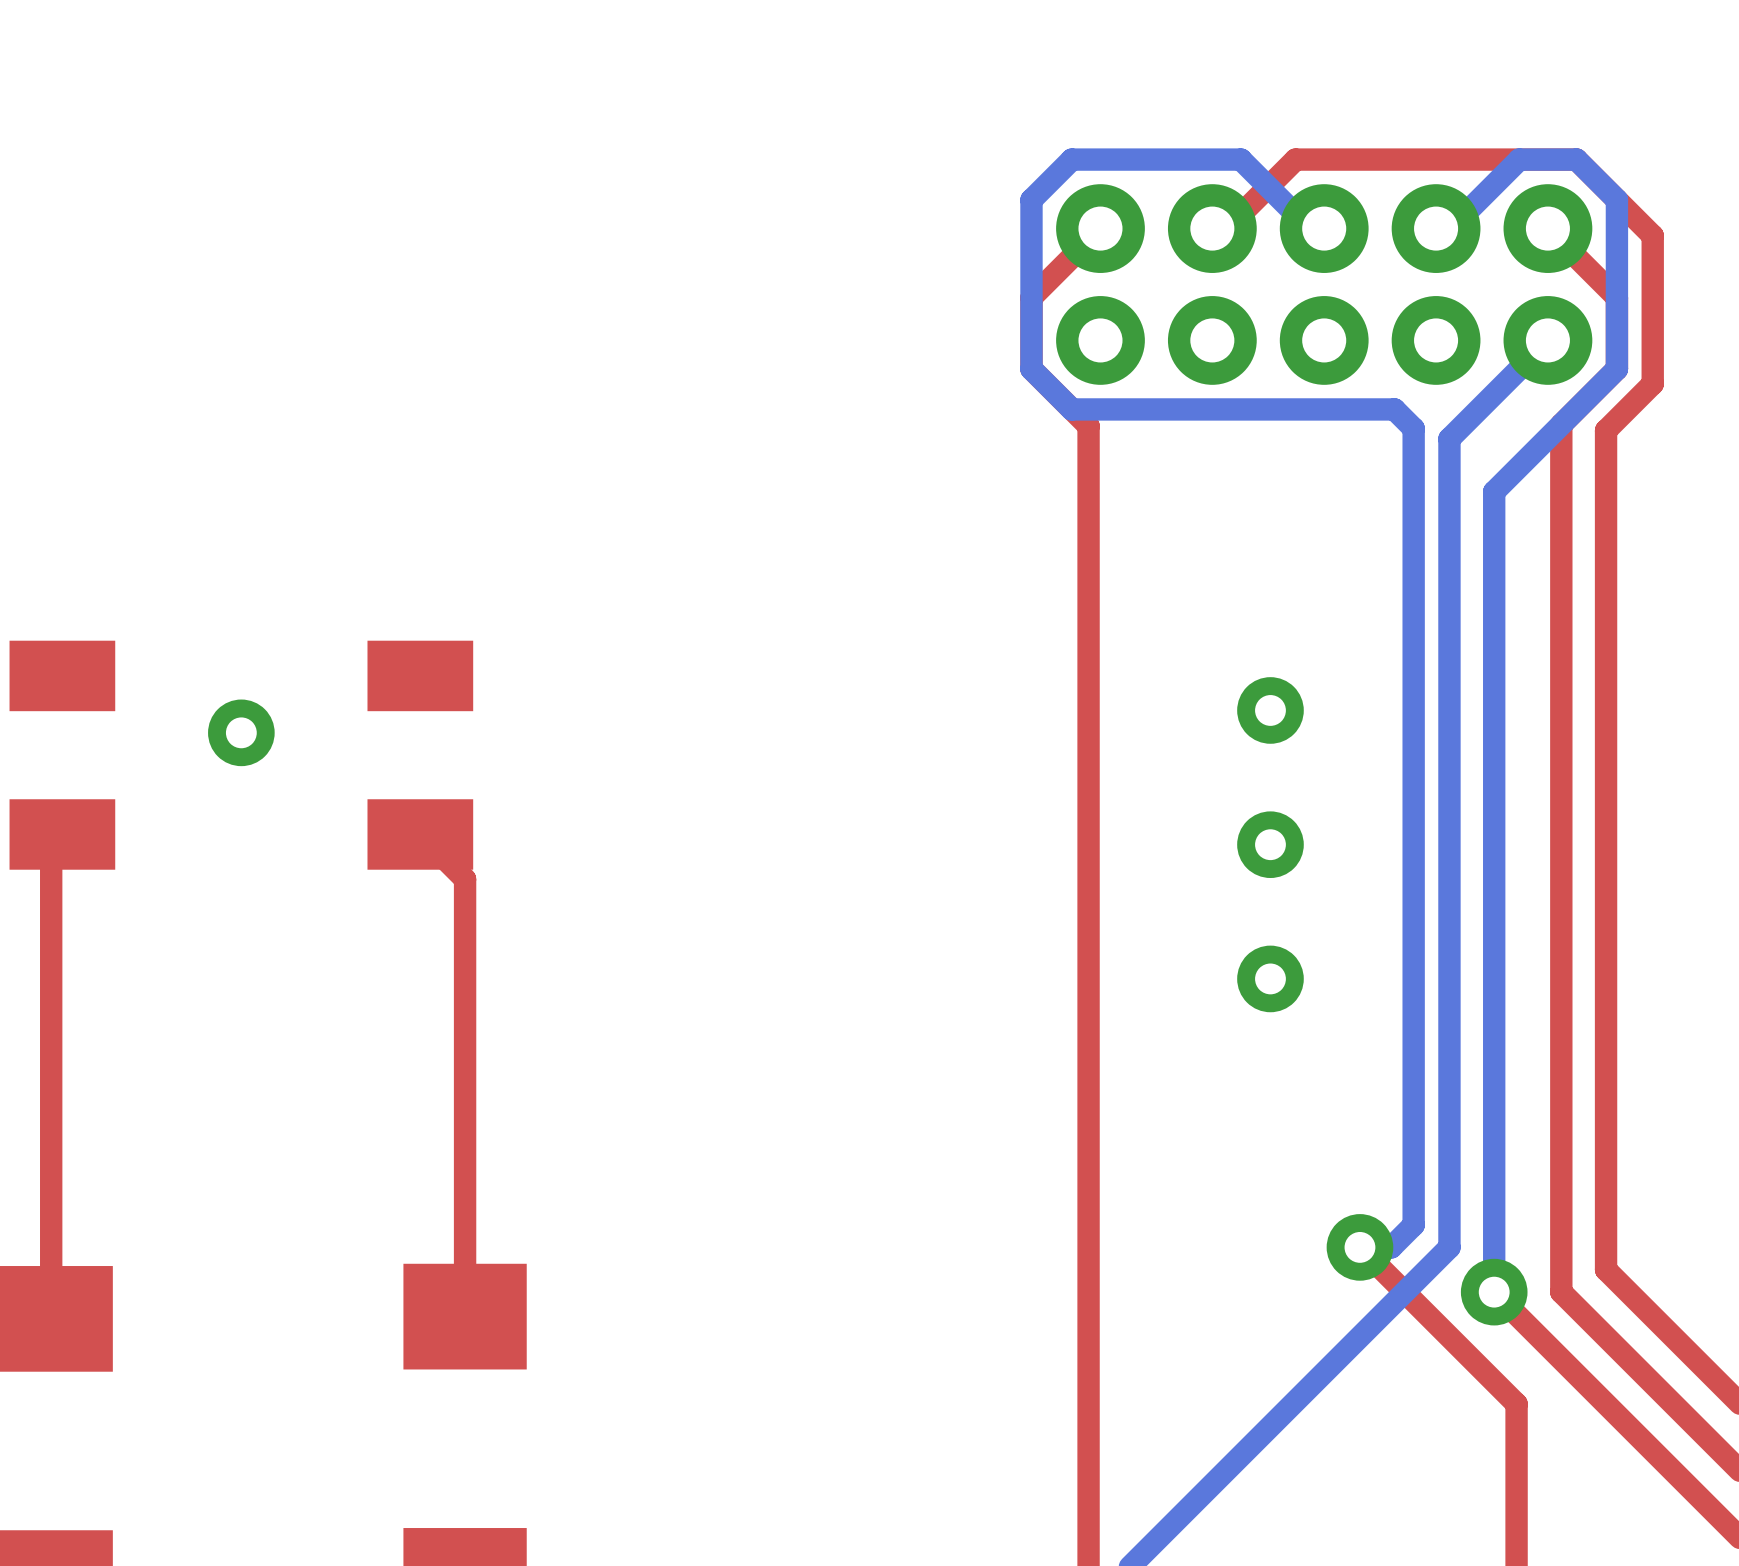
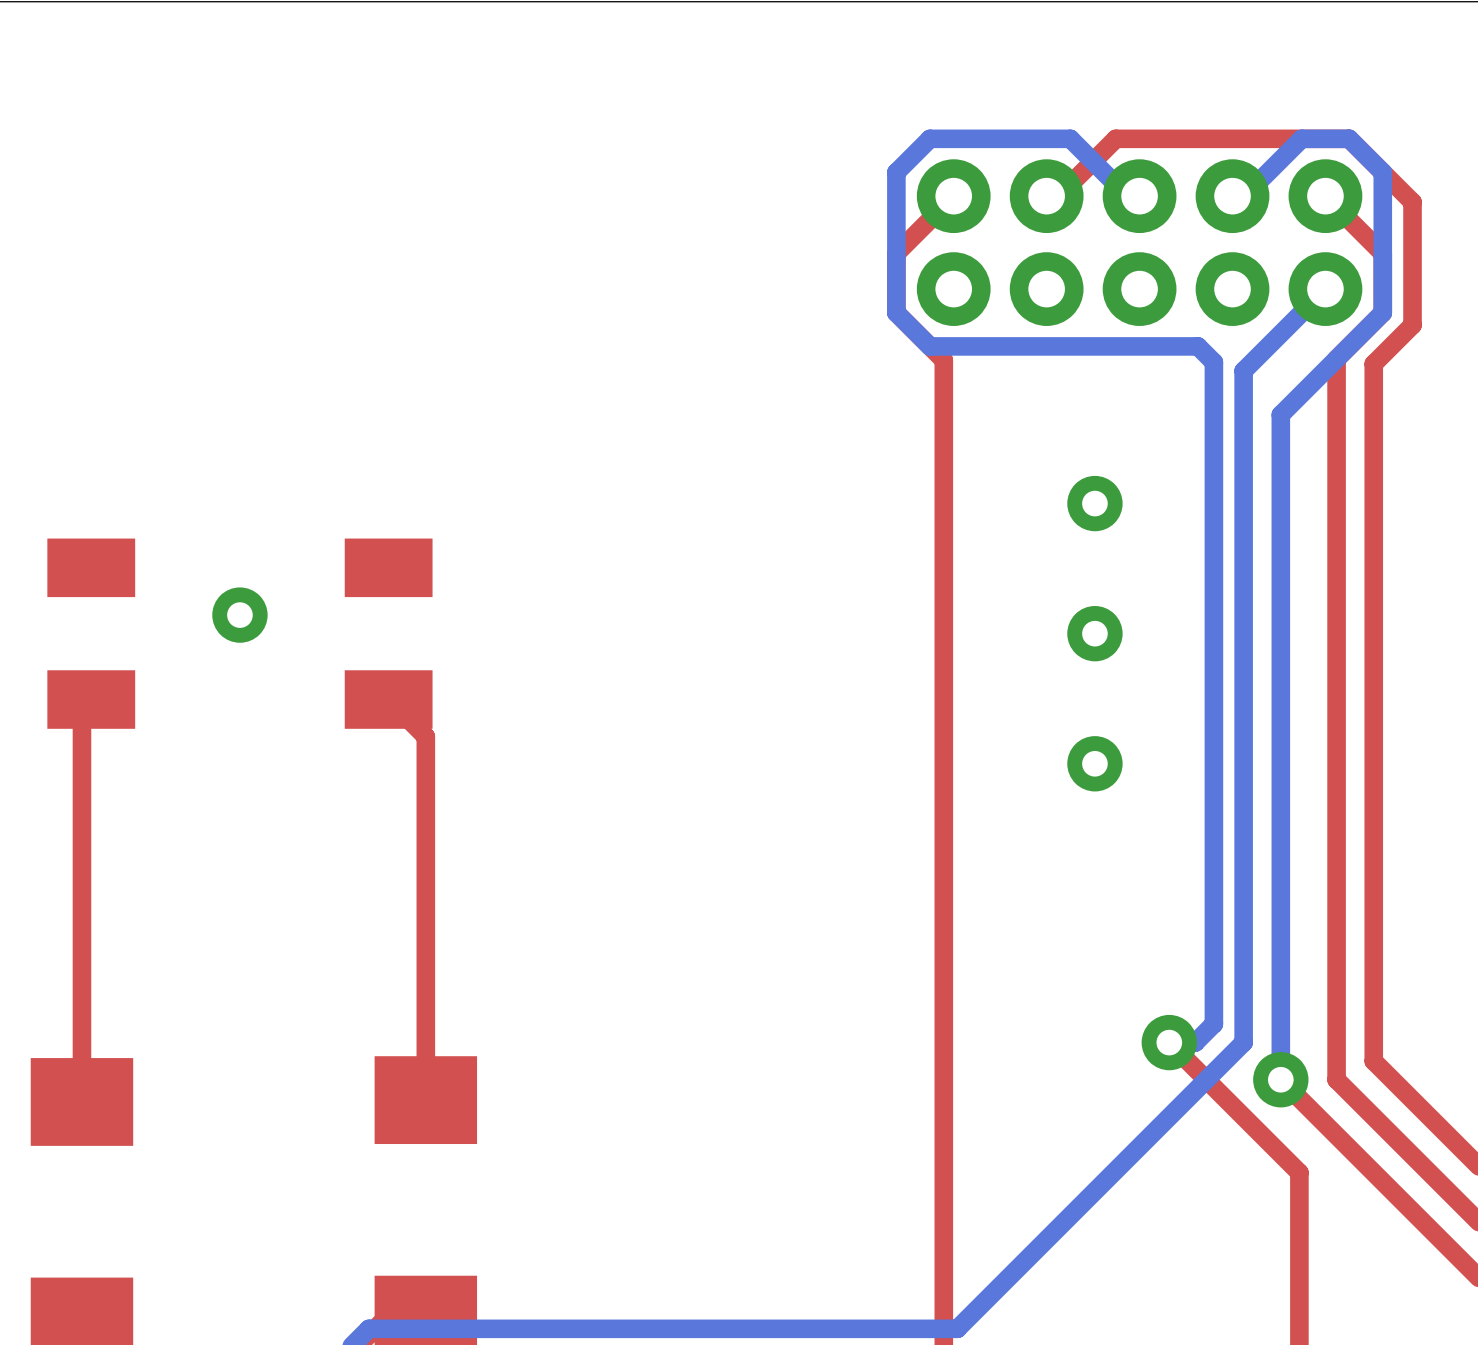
via: none -> (1094, 503)
via position: (1270, 710) -> (1094, 633)
via: (1270, 844) -> none
via: none -> (1094, 763)
via: (1270, 978) -> none

